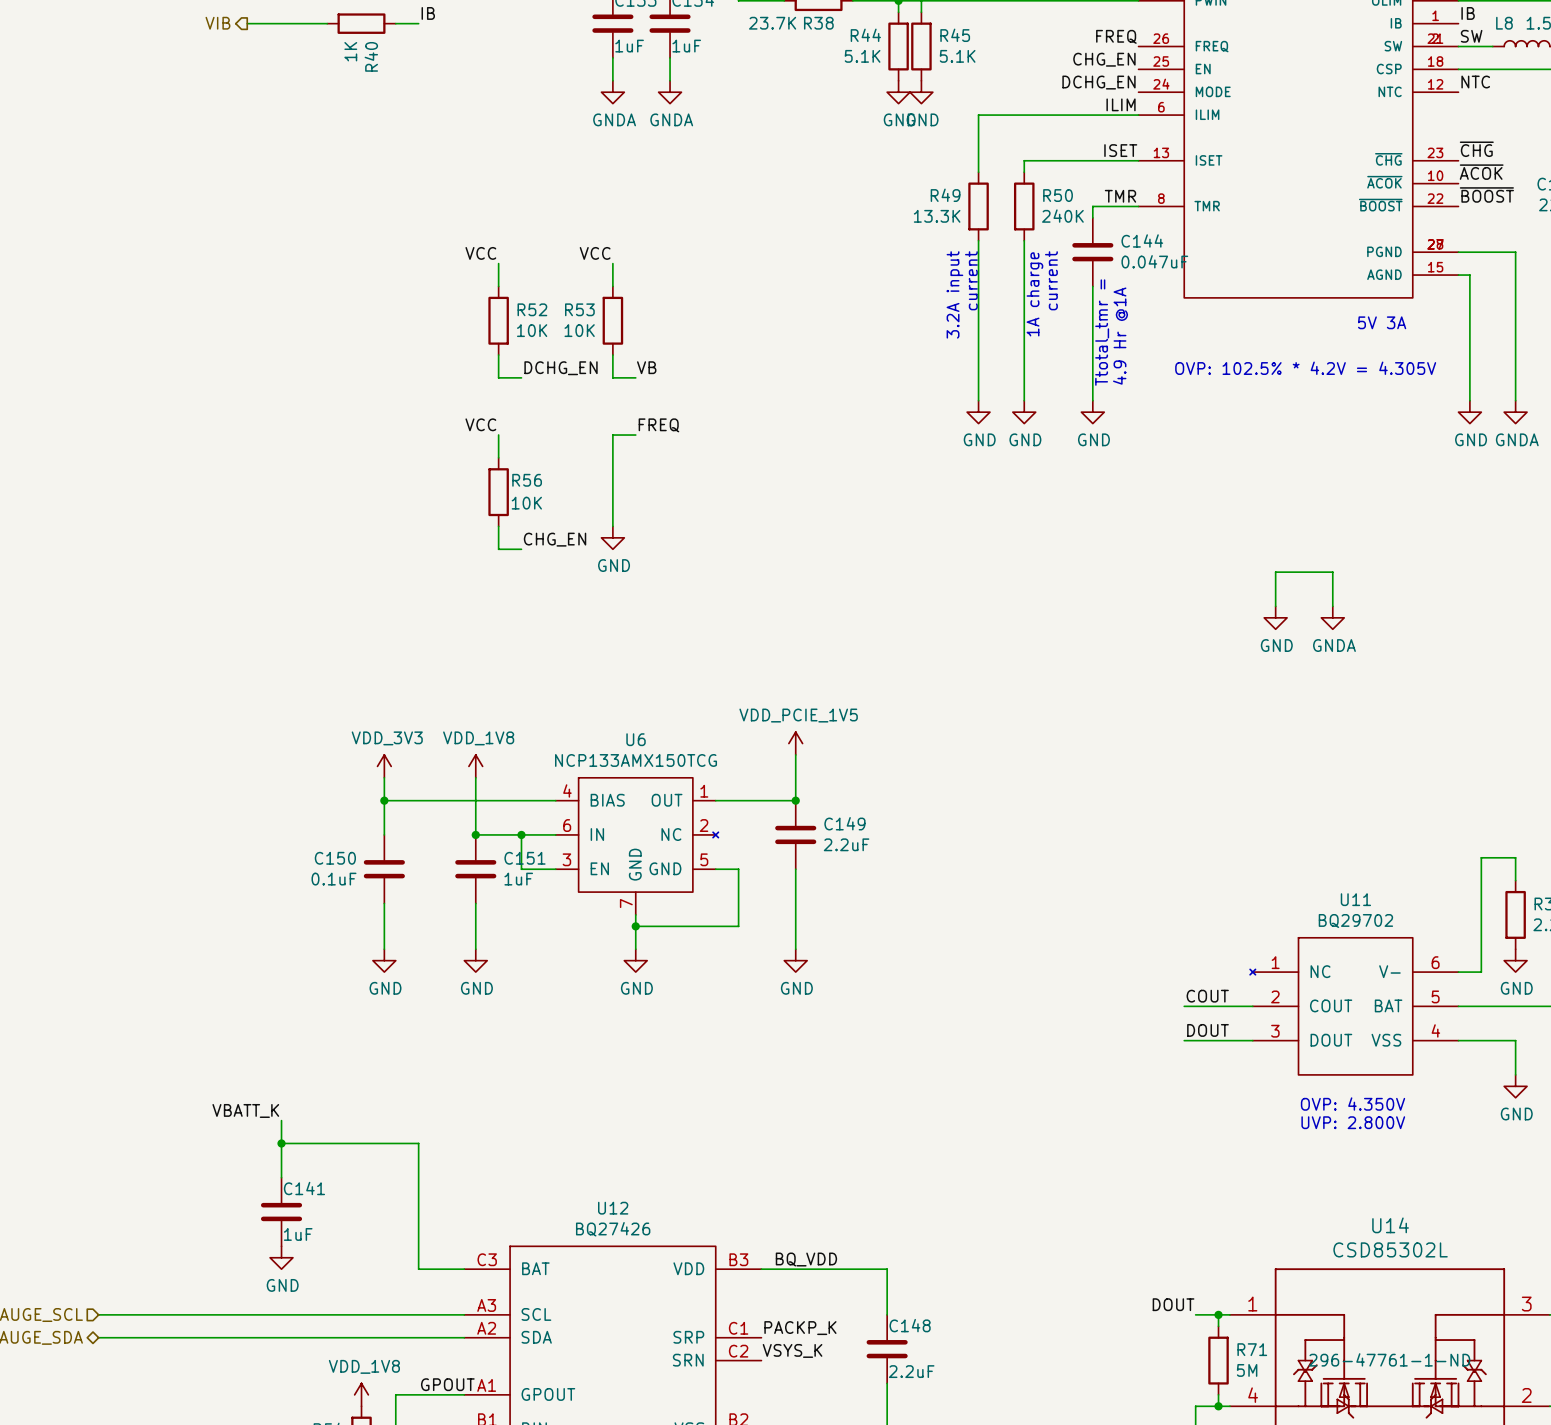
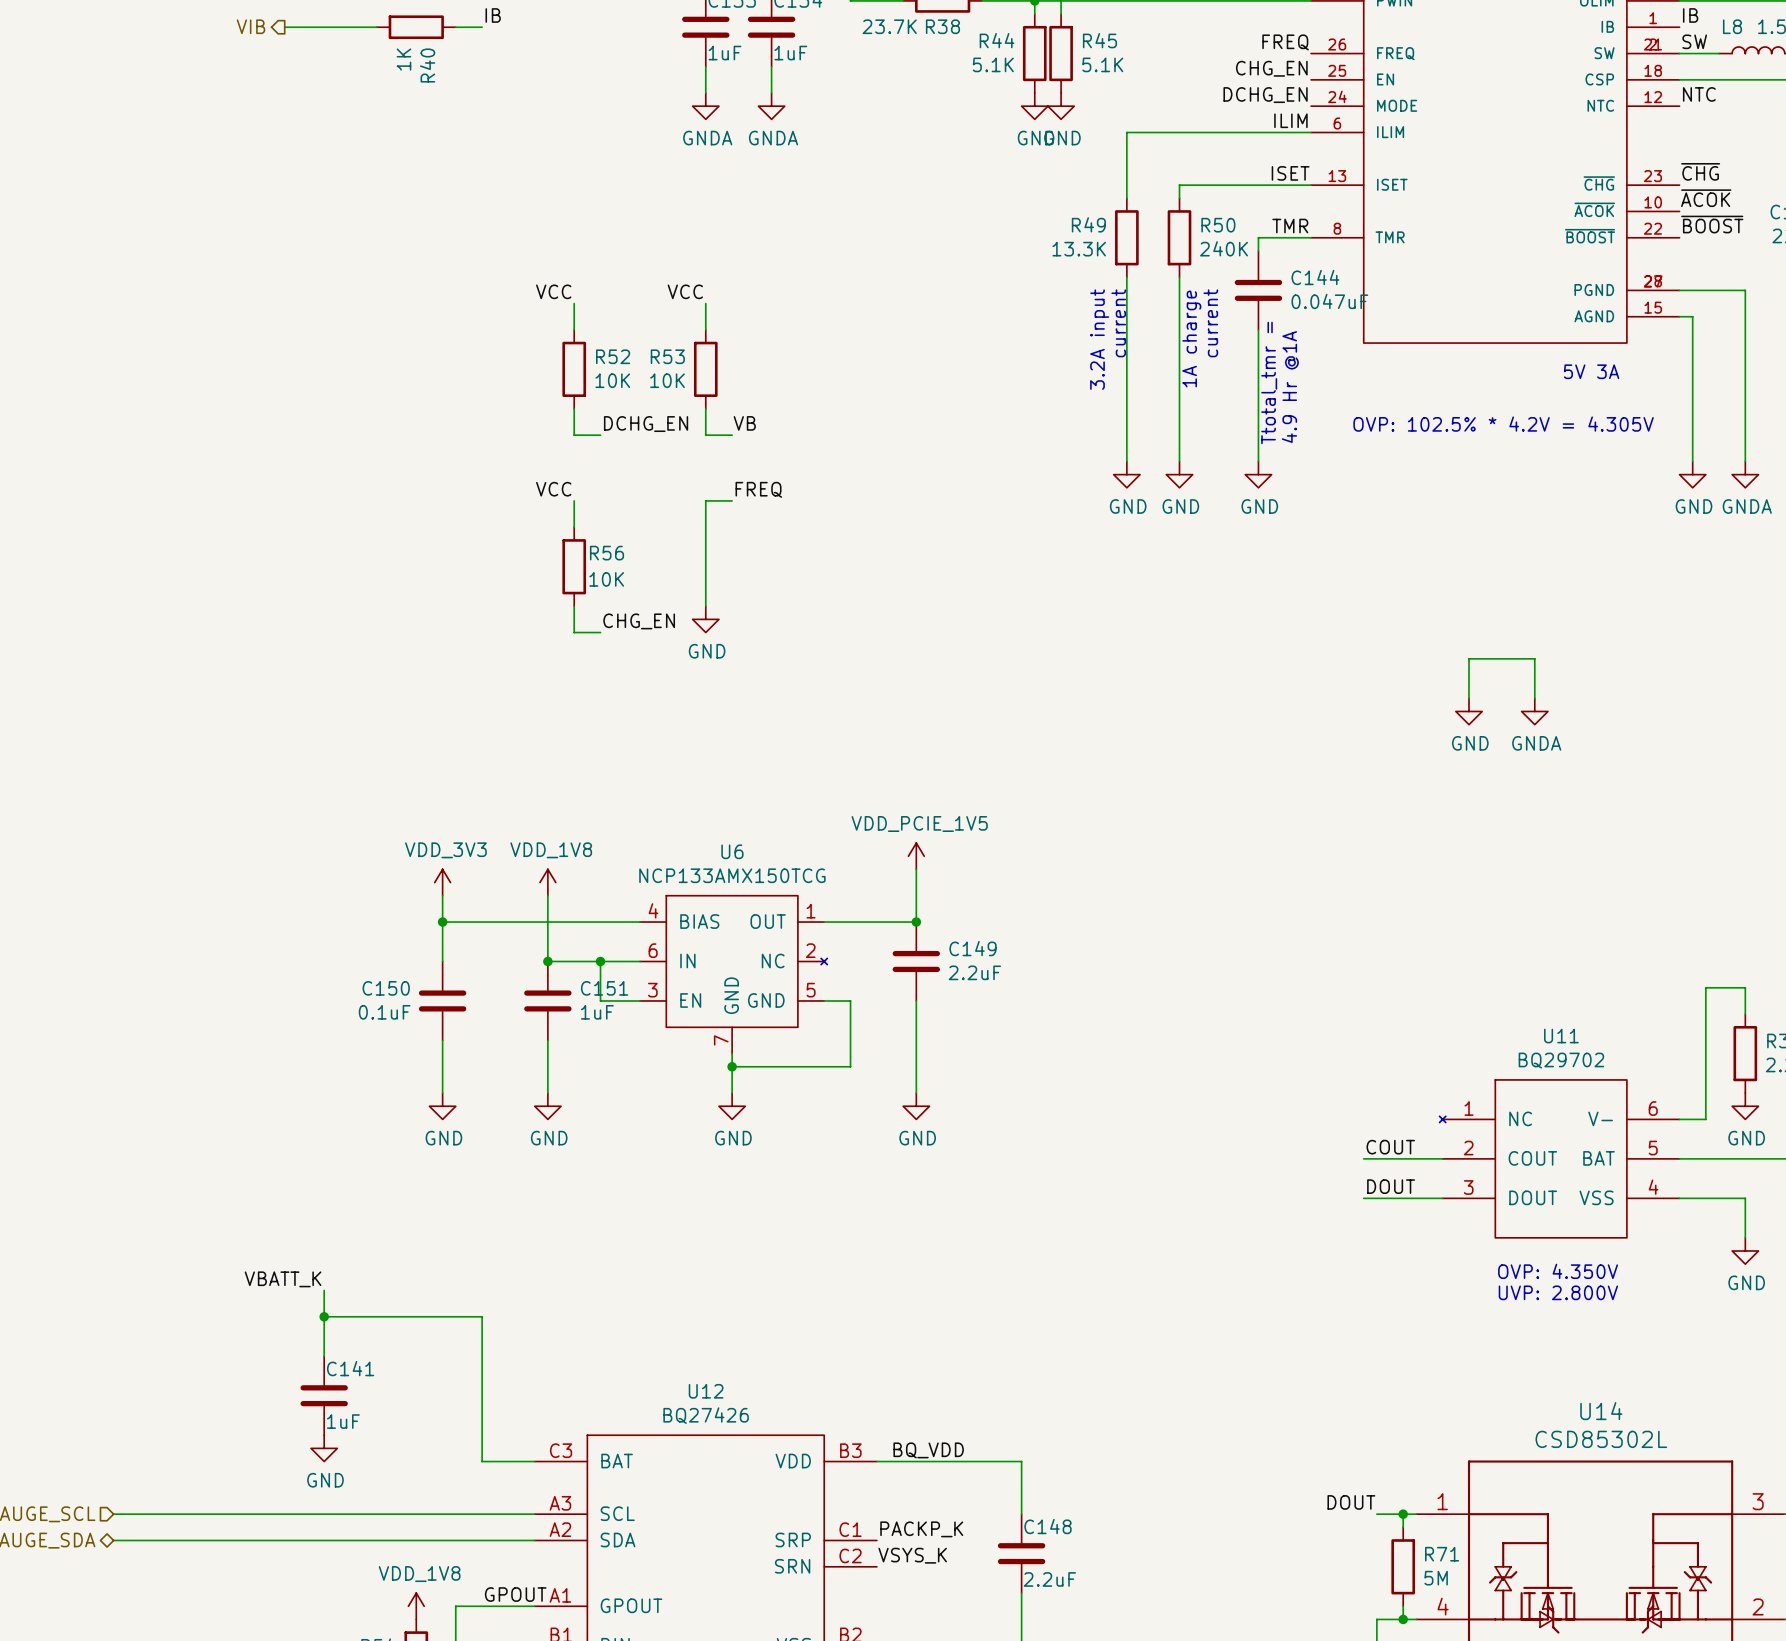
U14 text: 296-47761-1-ND (1389, 1359) -> none

